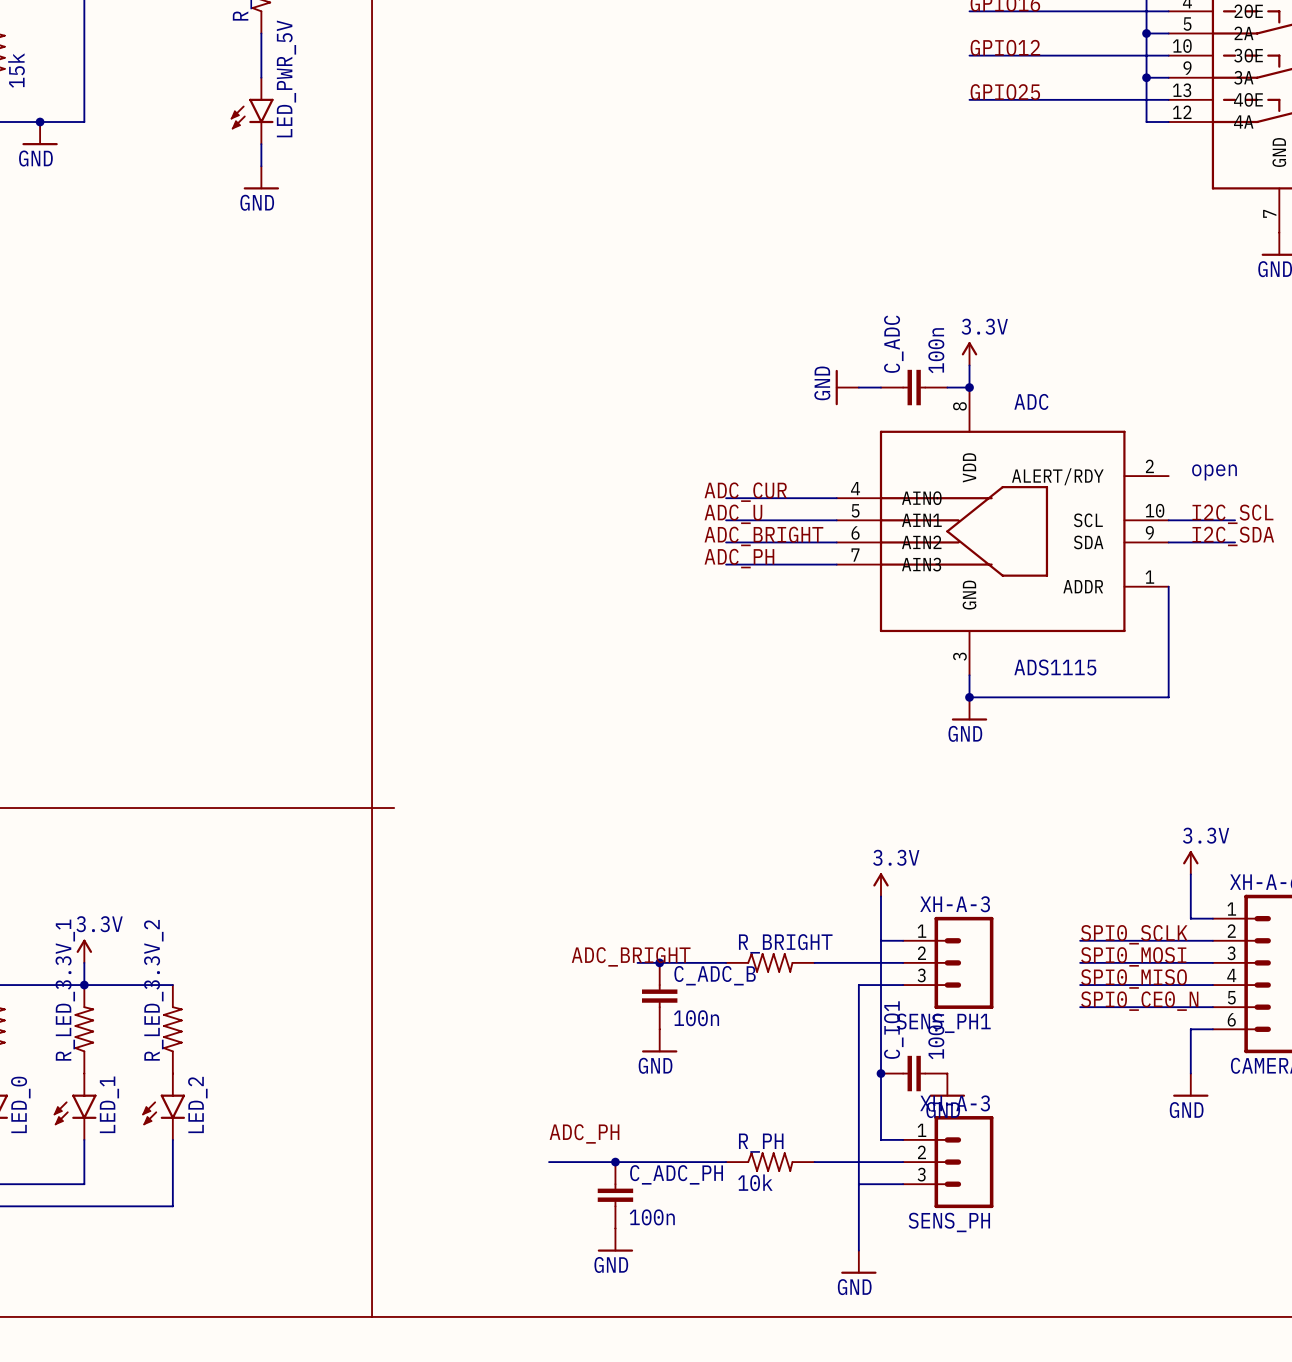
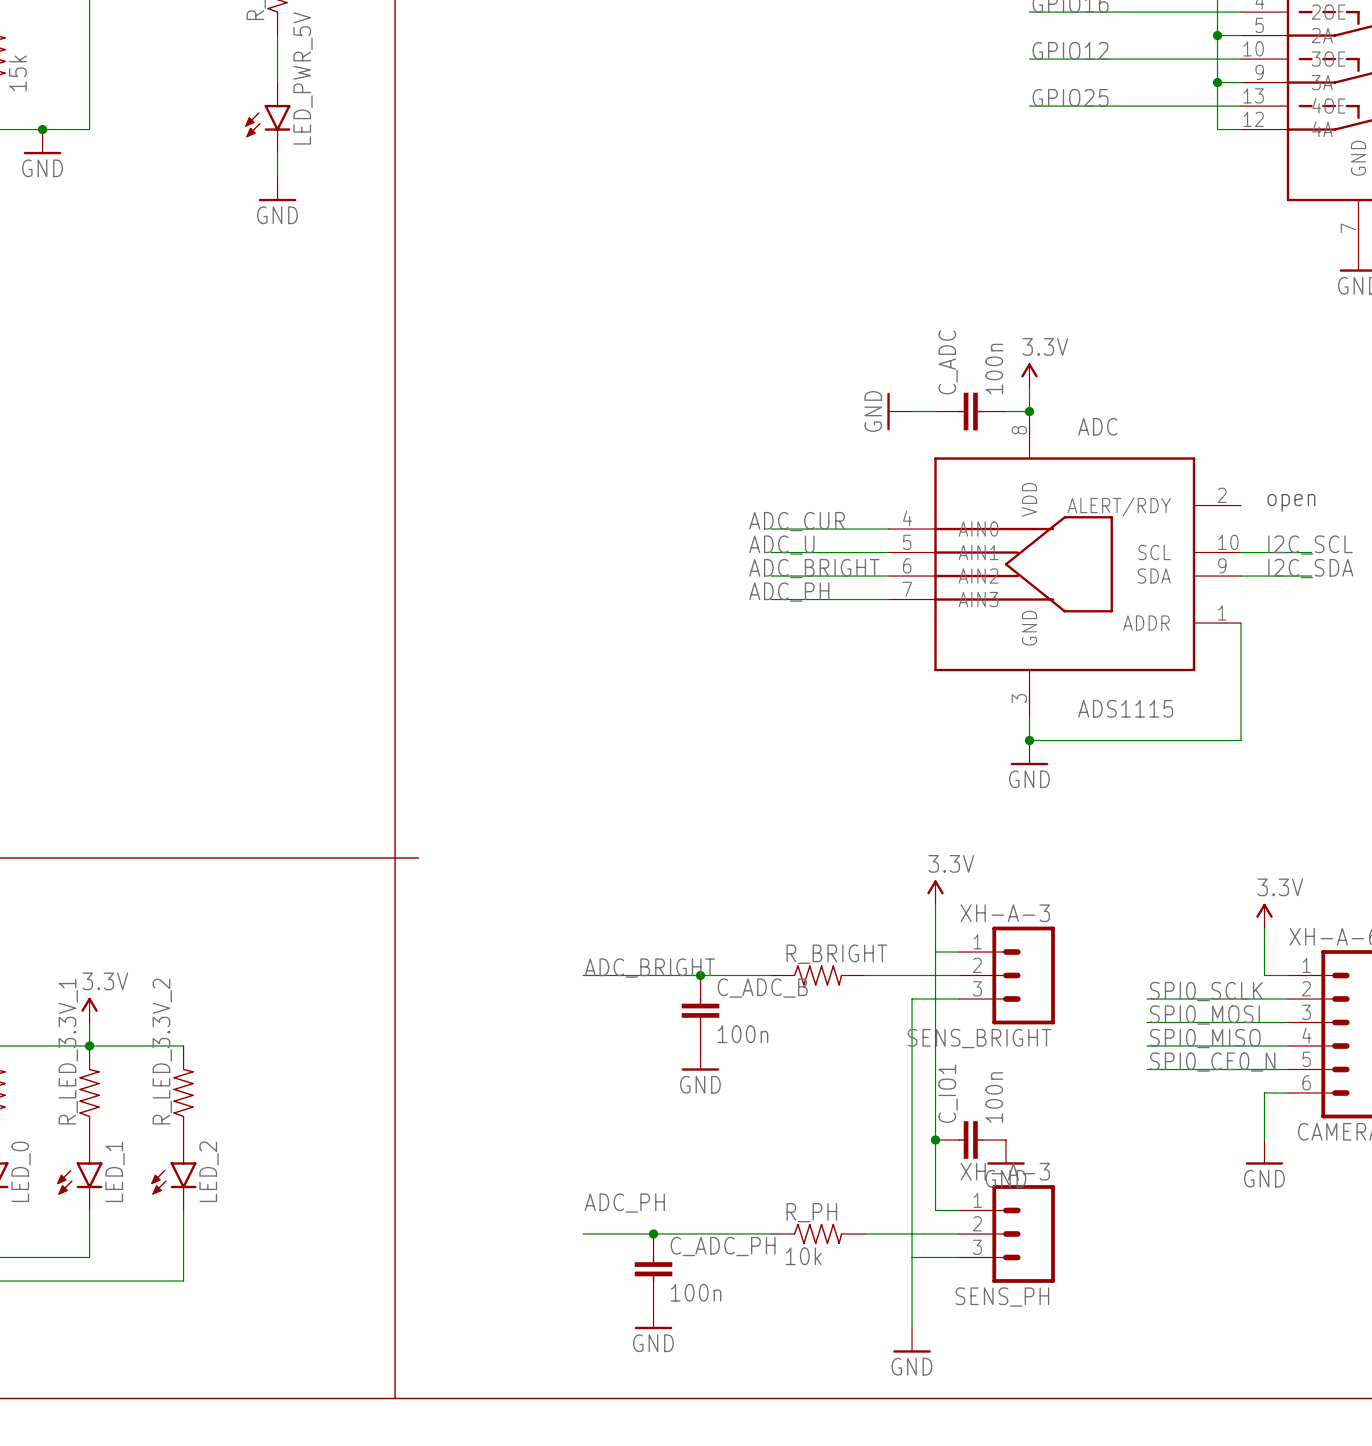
wire: none -> (935, 905) (935, 952) (959, 952)
power symbol position: 3.3V (880, 884) -> 3.3V (935, 892)
wire: none -> (583, 975) (771, 975)
SENS_BRIGHT: none -> XH-A-3 (1006, 975)
label position: ADC_BRIGHT (631, 956) -> ADC_BRIGHT (649, 968)
wire: (637, 962) (726, 962) -> none
junction position: (659, 962) -> (700, 975)
R_BRIGHT position: (770, 962) -> (818, 975)
wire: (814, 962) (903, 962) -> (865, 975) (959, 975)
SENS_PH1: XH-A-3 (948, 962) -> none
wire: (858, 985) (903, 985) -> (912, 1046) (912, 999) (935, 999)
C_ADC_B position: (659, 996) -> (700, 1010)
power symbol position: GND (659, 1040) -> GND (700, 1058)

